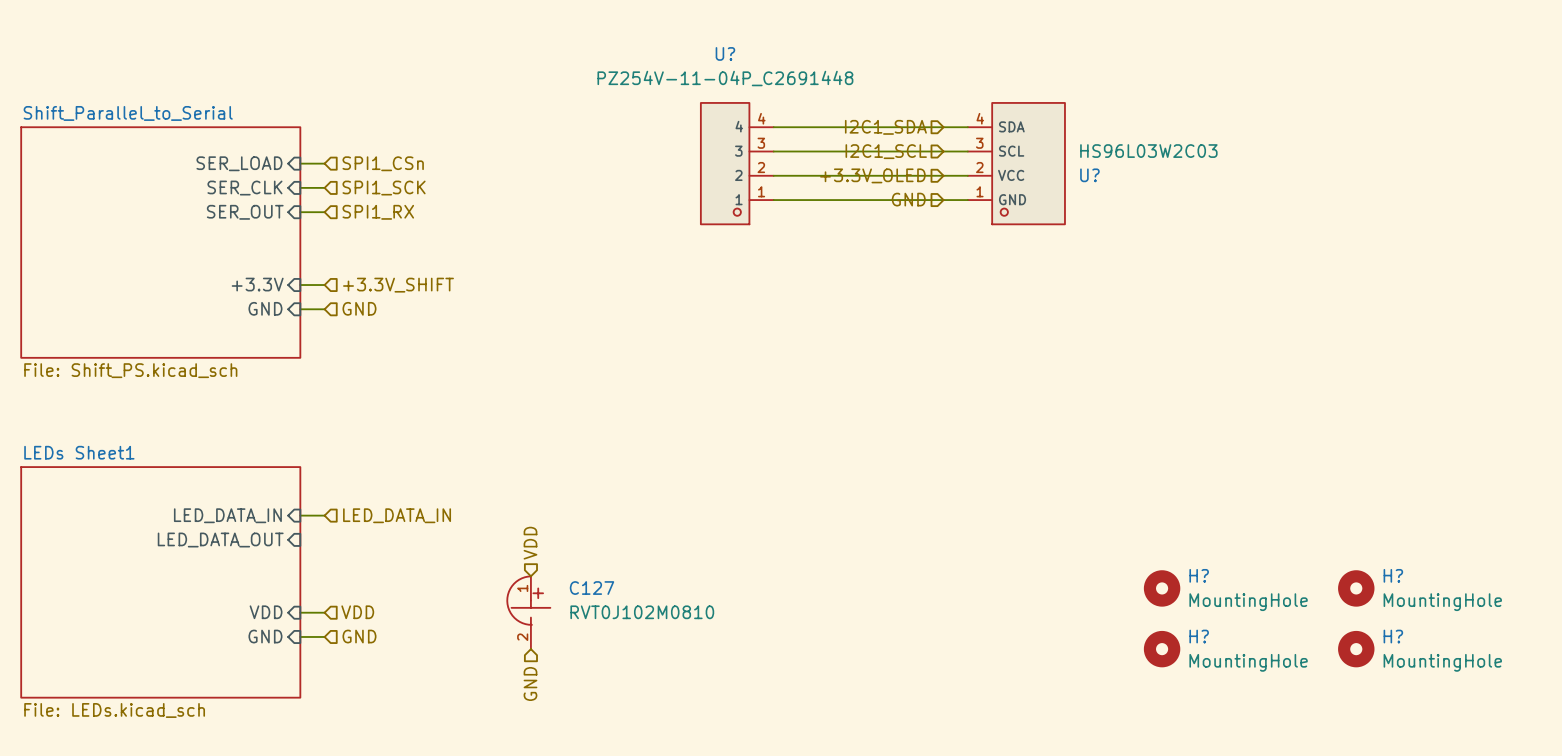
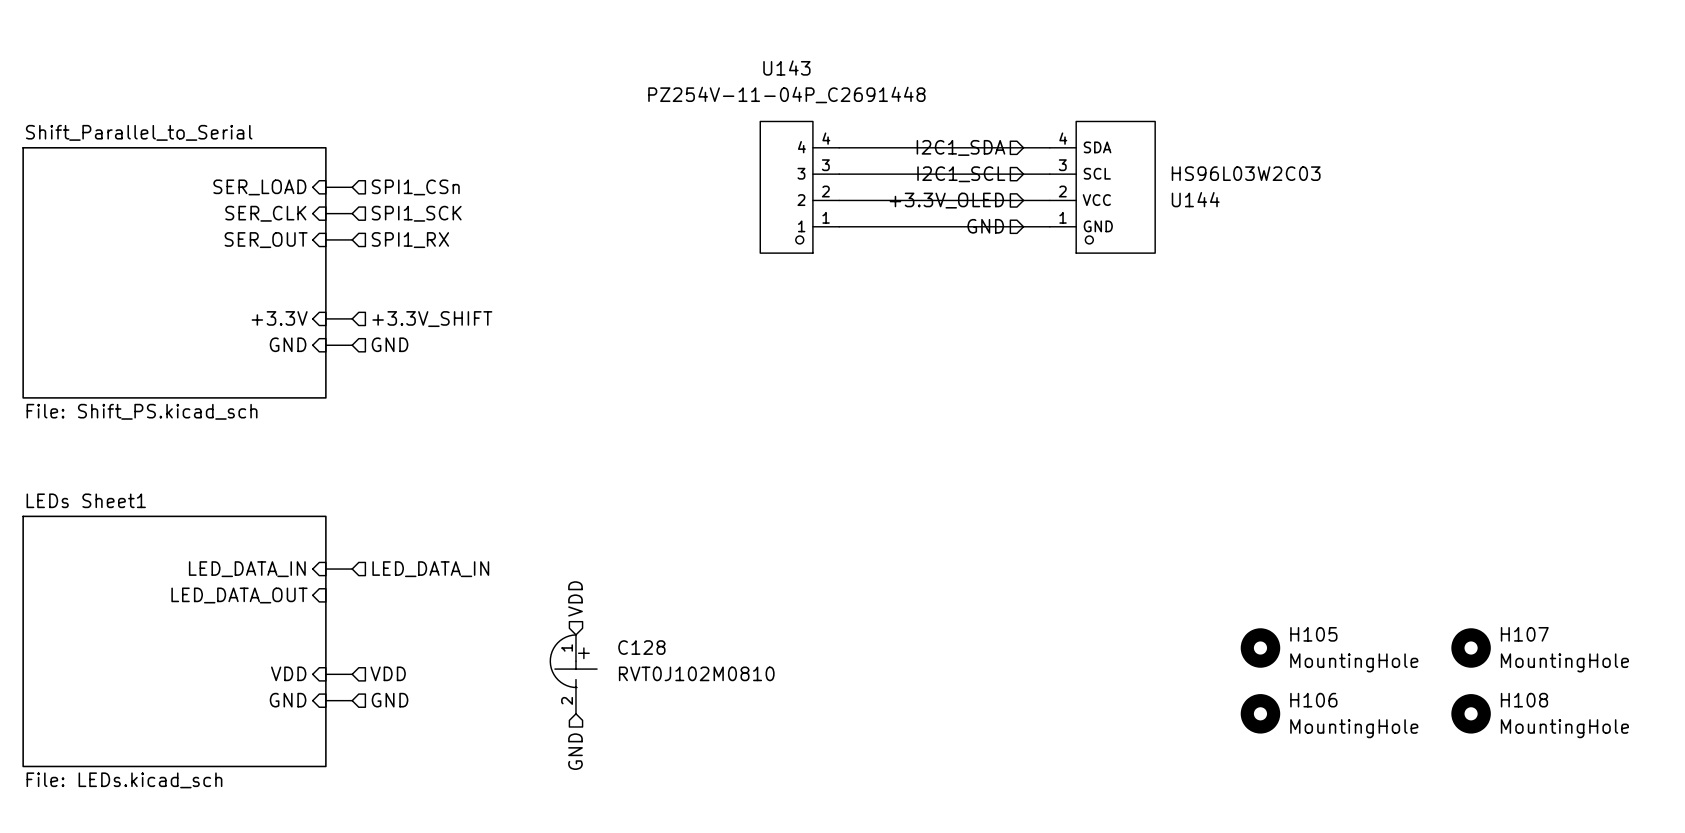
U? name: U? (725, 53) -> U143 (786, 68)
U? name: U? (1089, 175) -> U144 (1195, 199)
H? name: H? (1199, 575) -> H105 (1313, 634)
H? name: H? (1393, 575) -> H107 (1524, 634)
C127 name: C127 (592, 588) -> C128 (641, 647)
H? name: H? (1199, 636) -> H106 (1313, 700)
H? name: H? (1393, 636) -> H108 (1524, 700)

